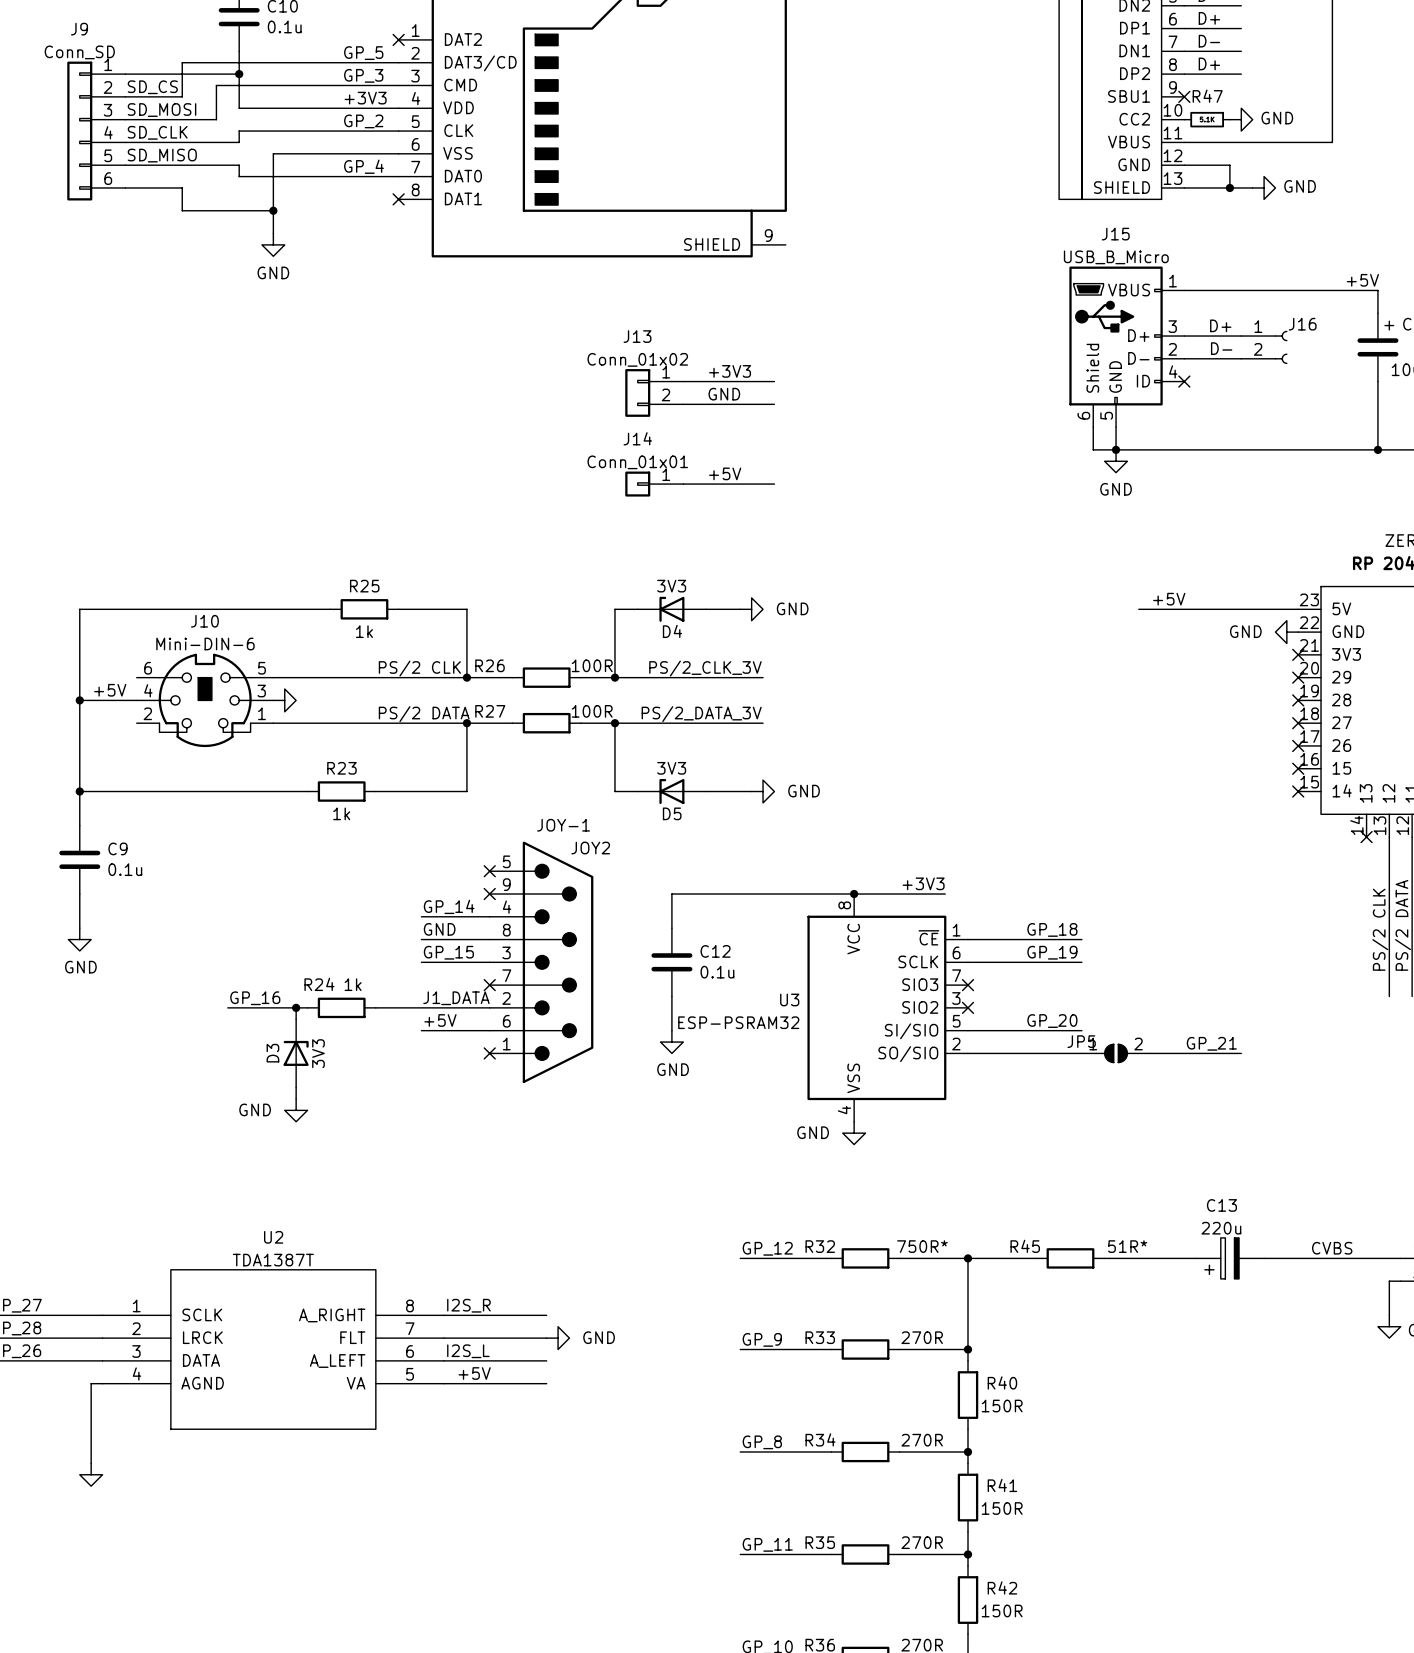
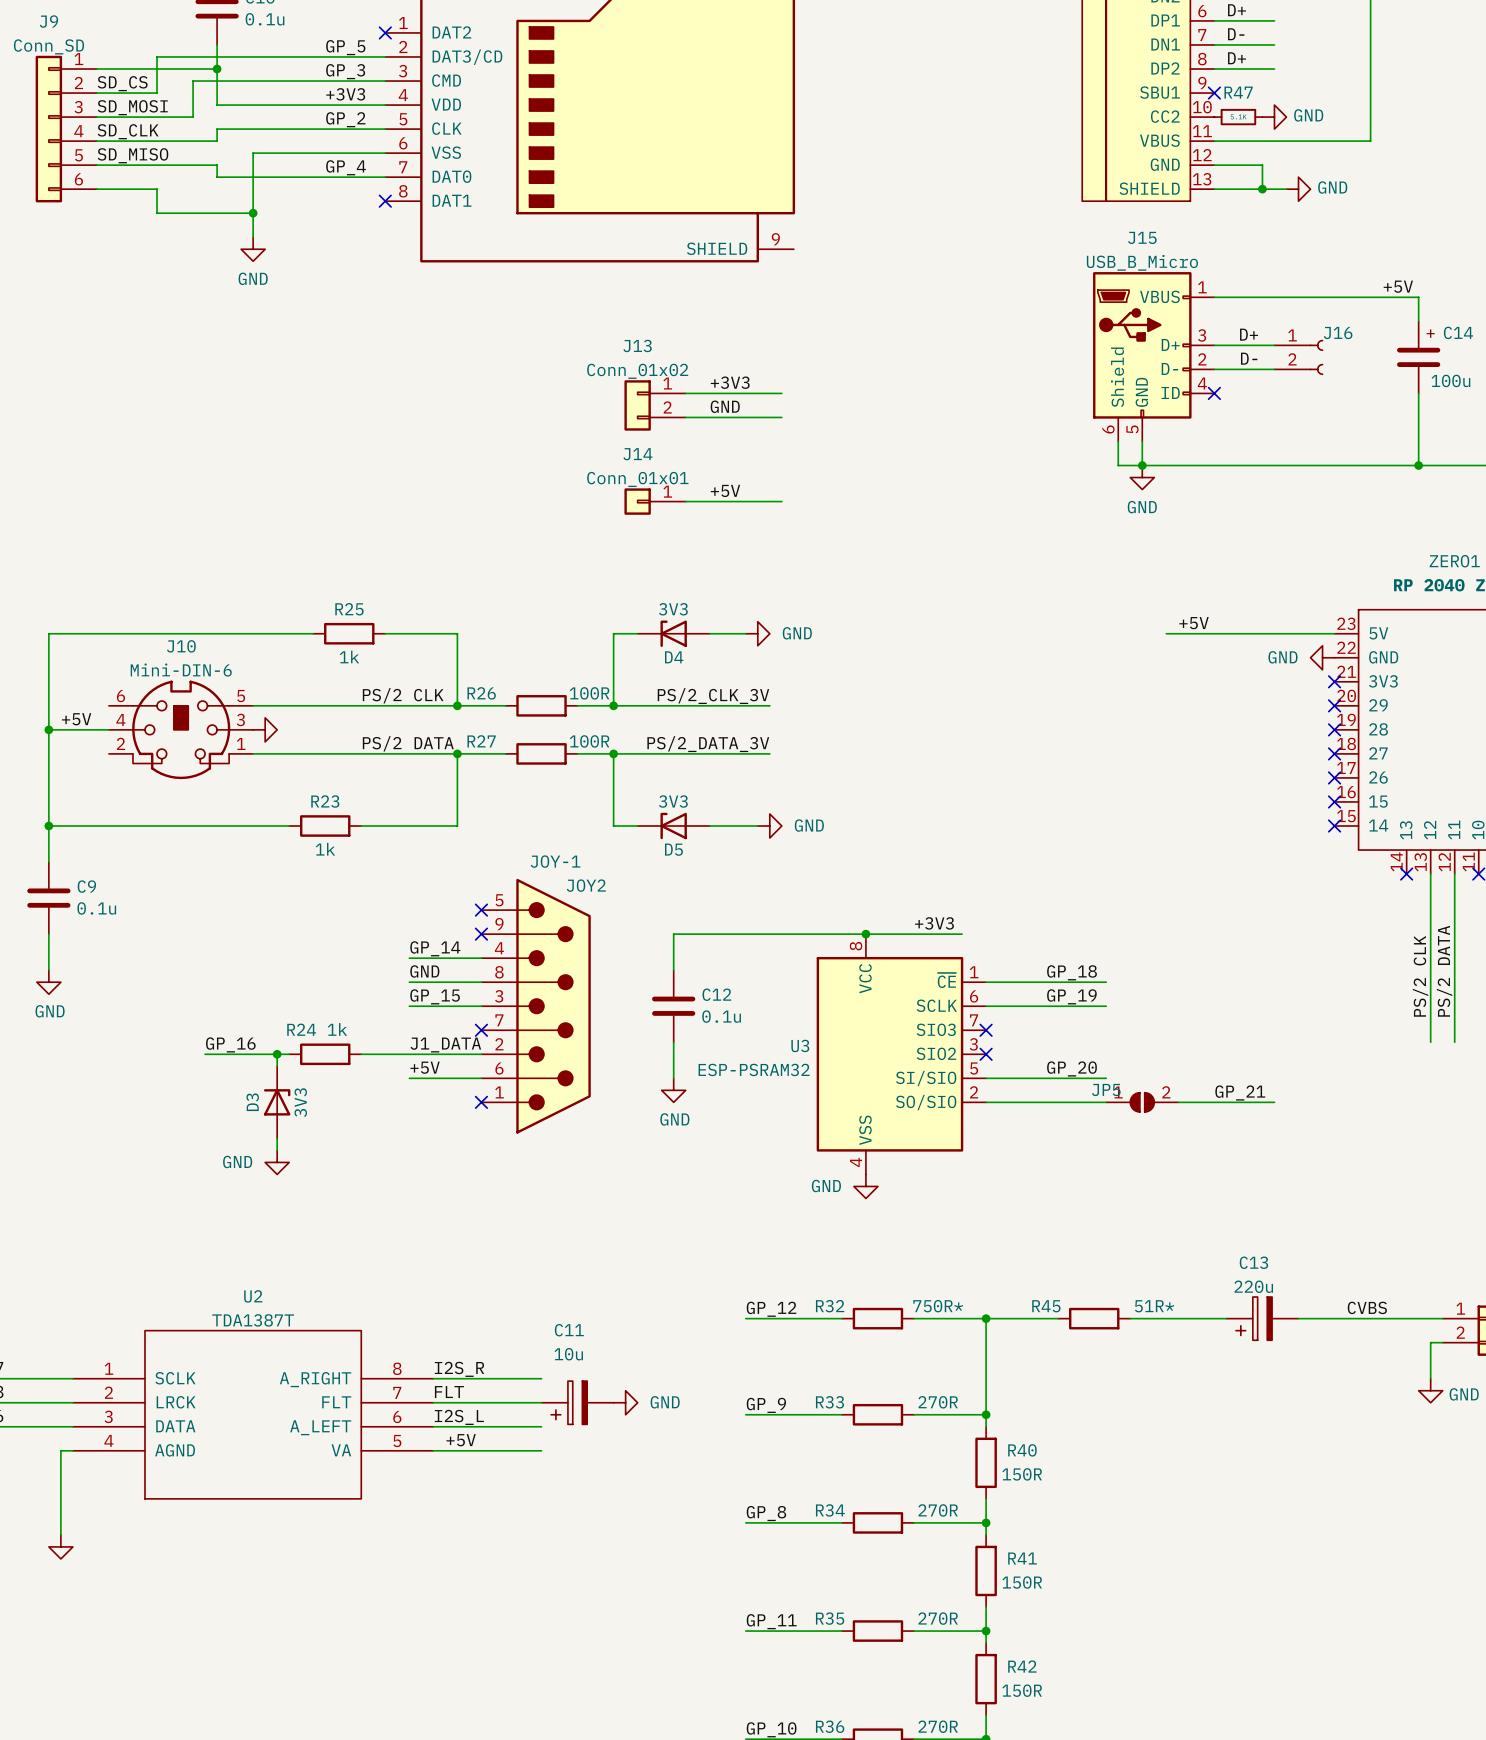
label: none -> FLT (449, 1392)
power symbol position: GND (558, 1338) -> GND (625, 1402)
C11: none -> 10u (577, 1402)

